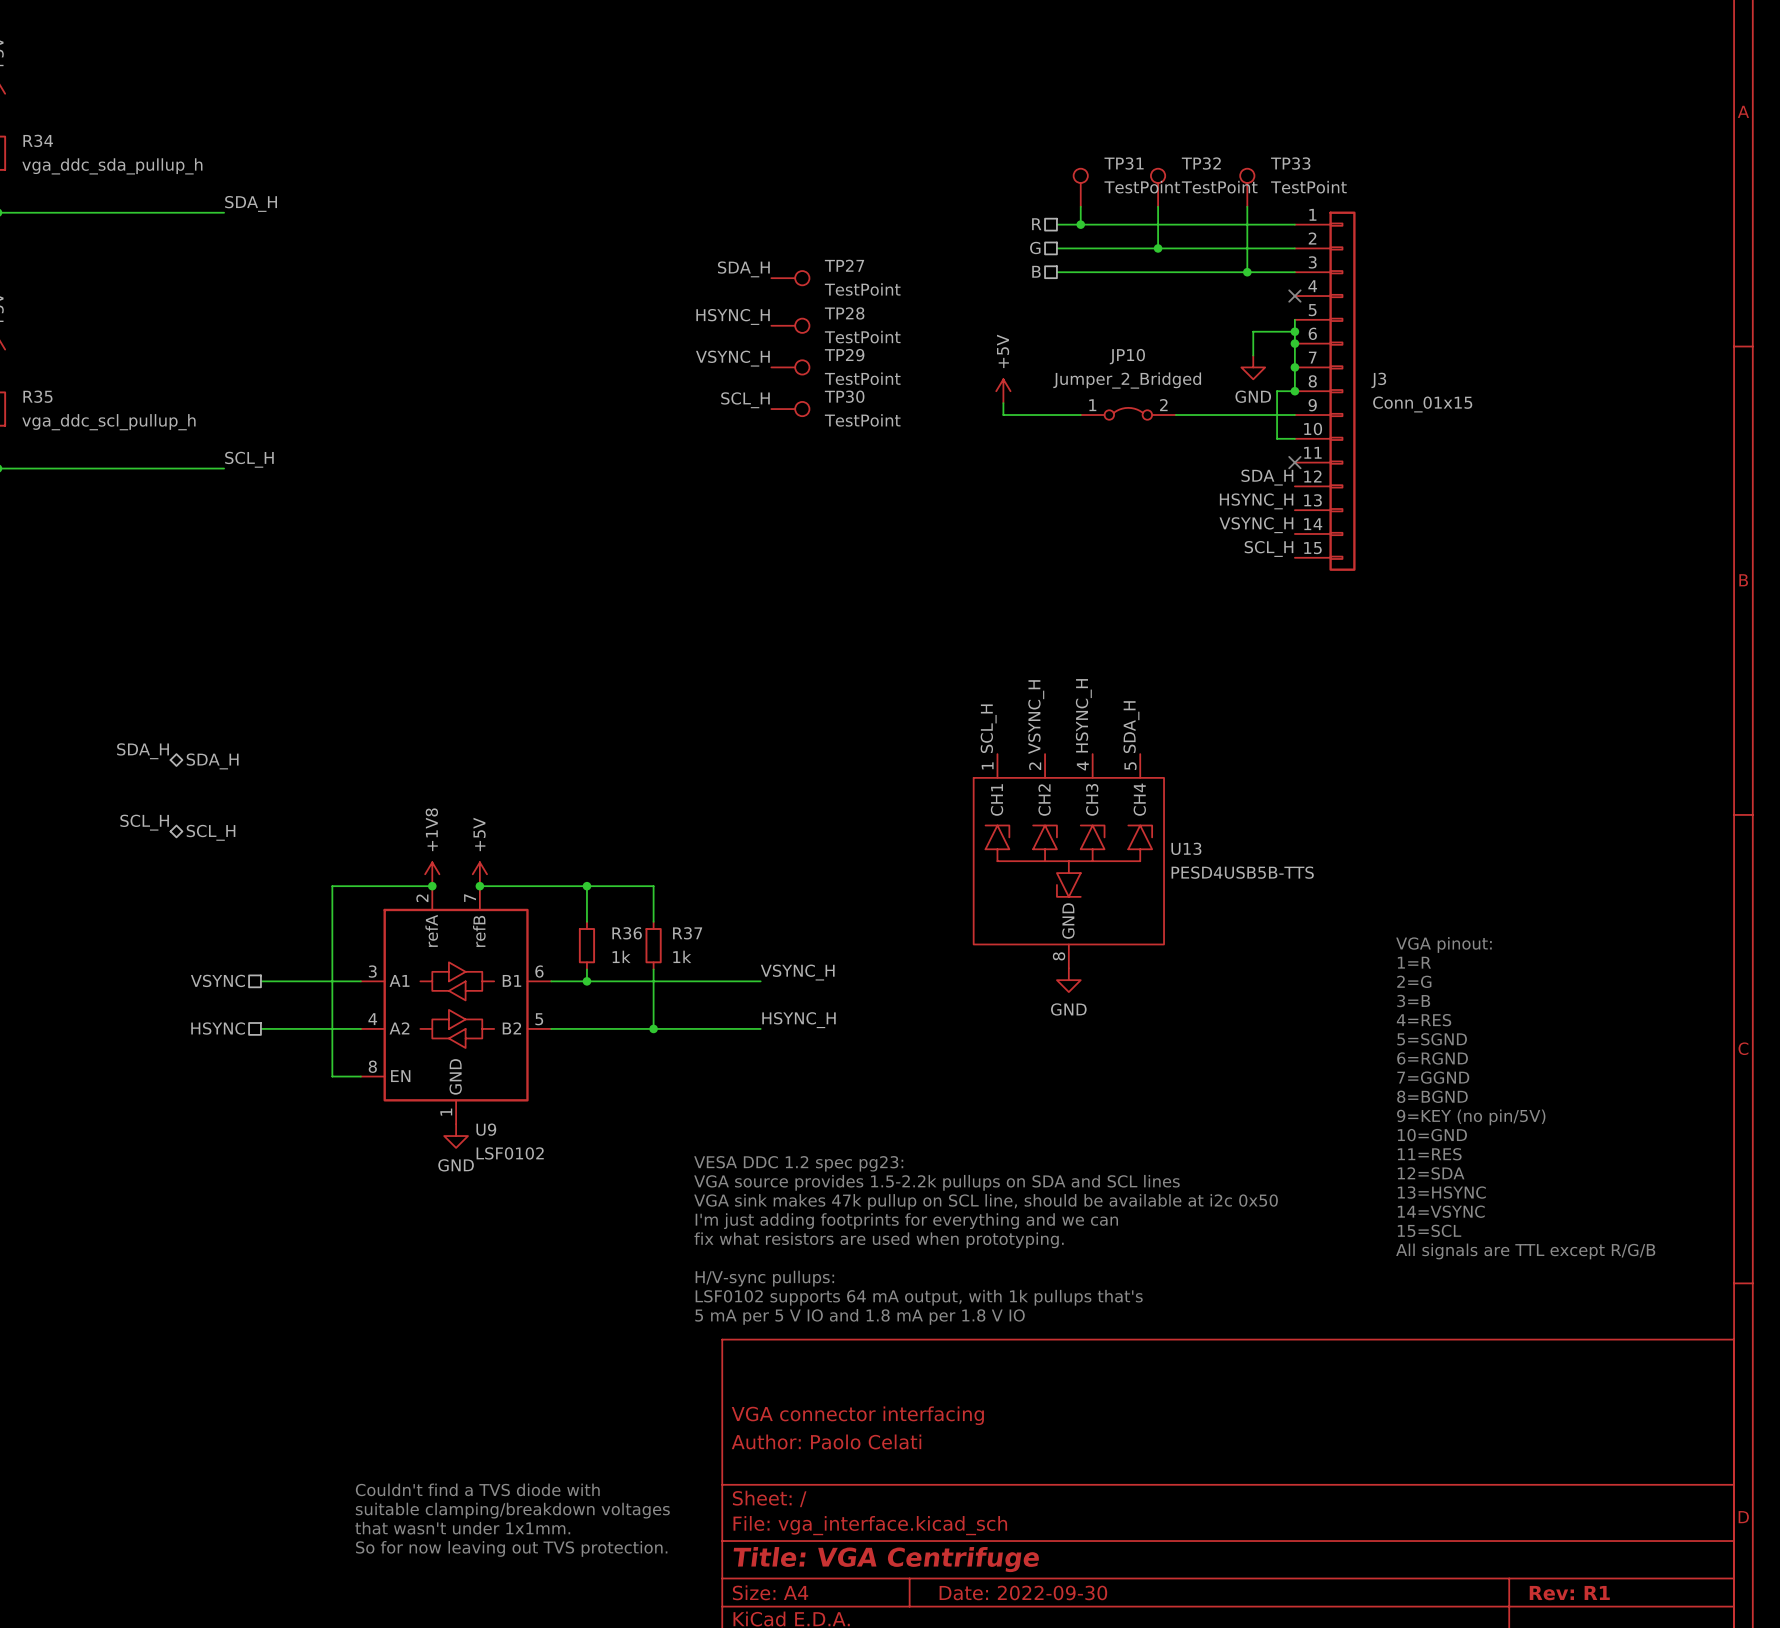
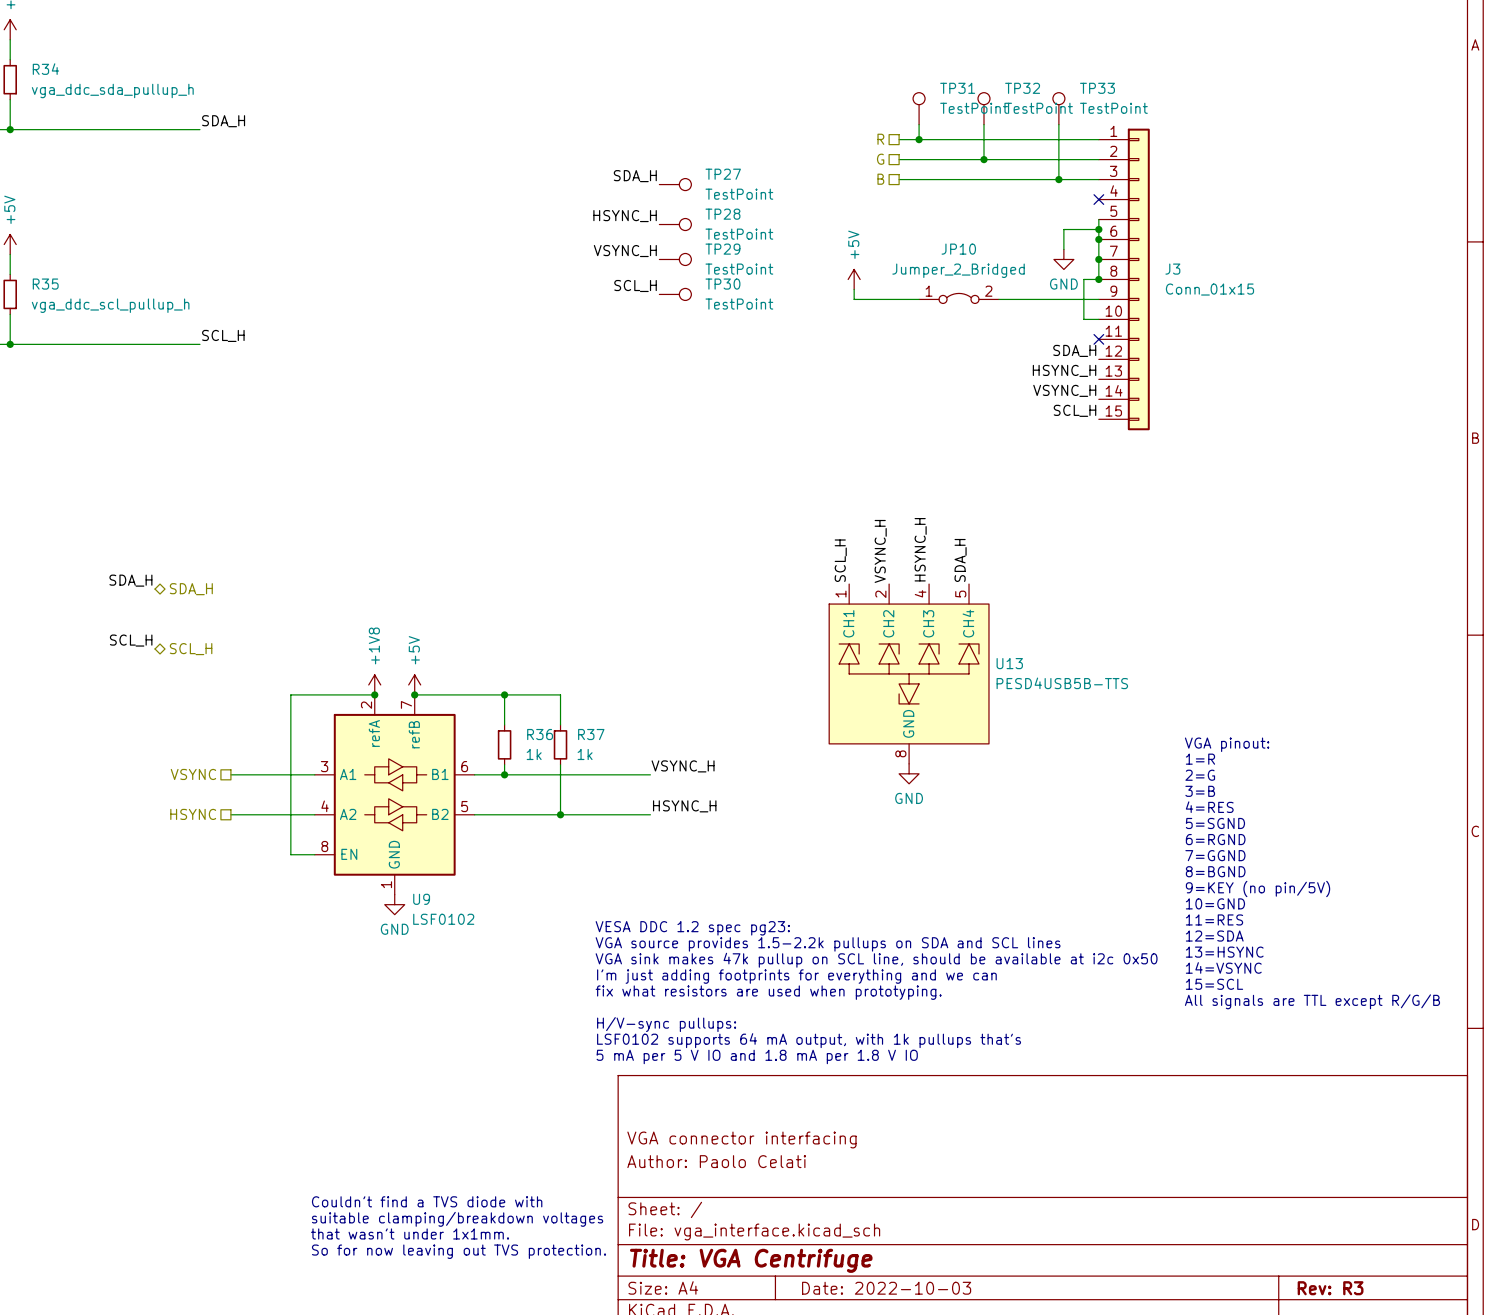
title block: Date: 2022-09-30 (1023, 1592) -> Date: 2022-10-03 (886, 1288)
title block: Rev: R1 (1569, 1593) -> Rev: R3 (1330, 1288)

